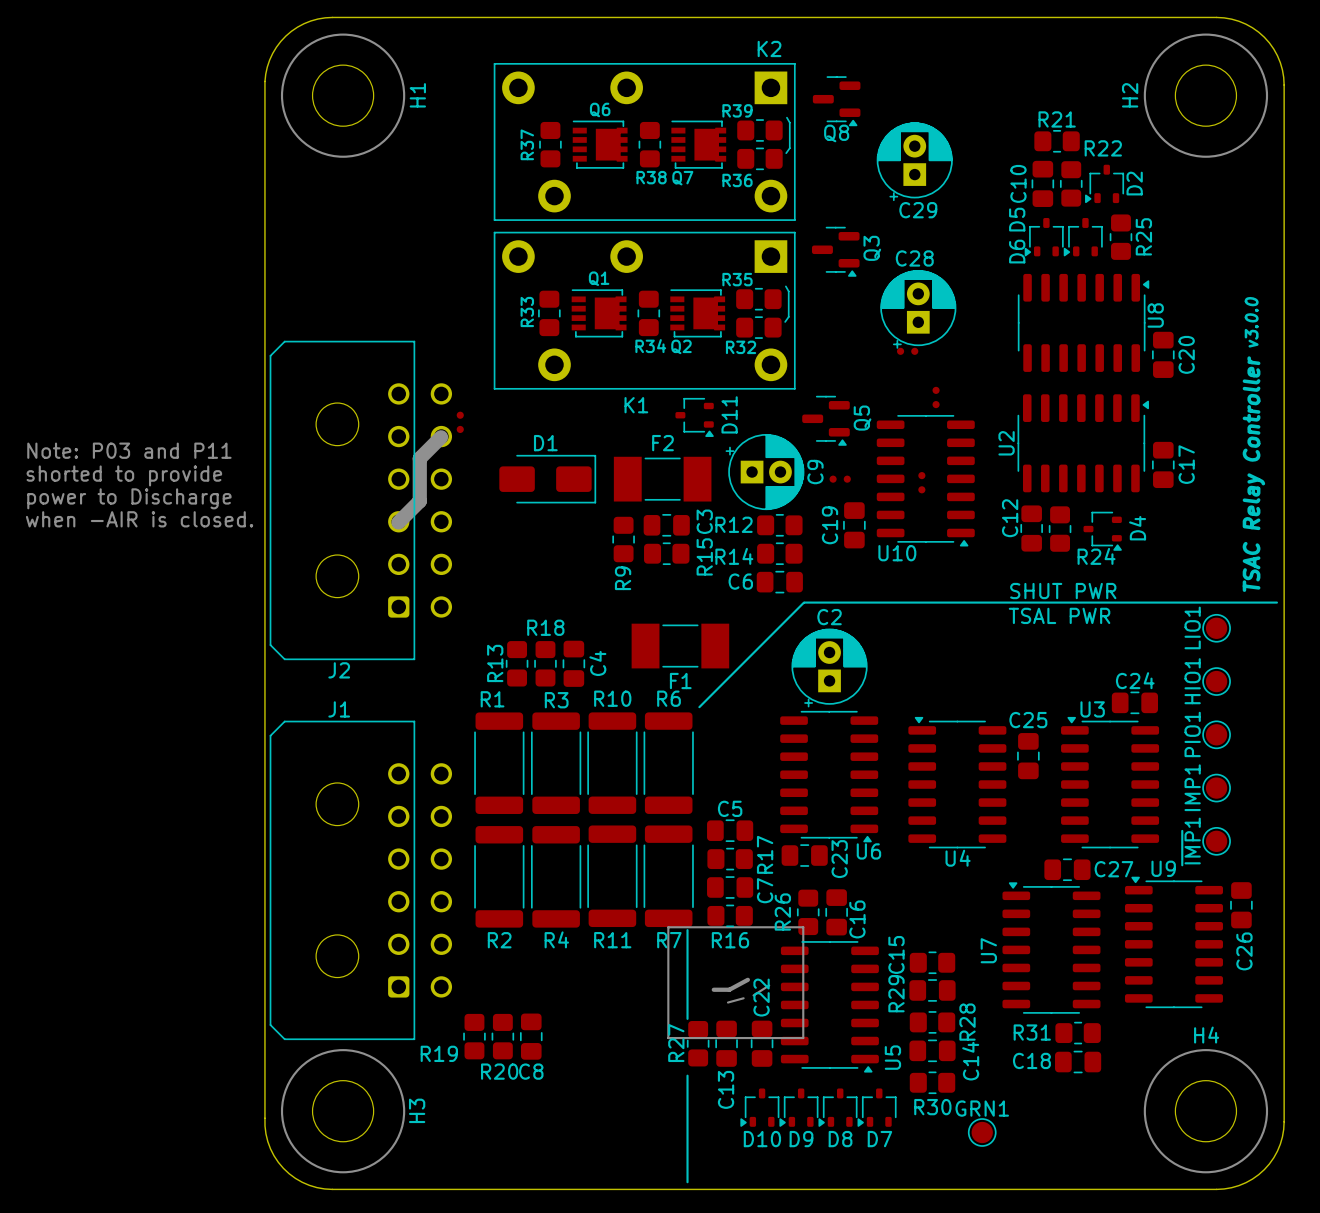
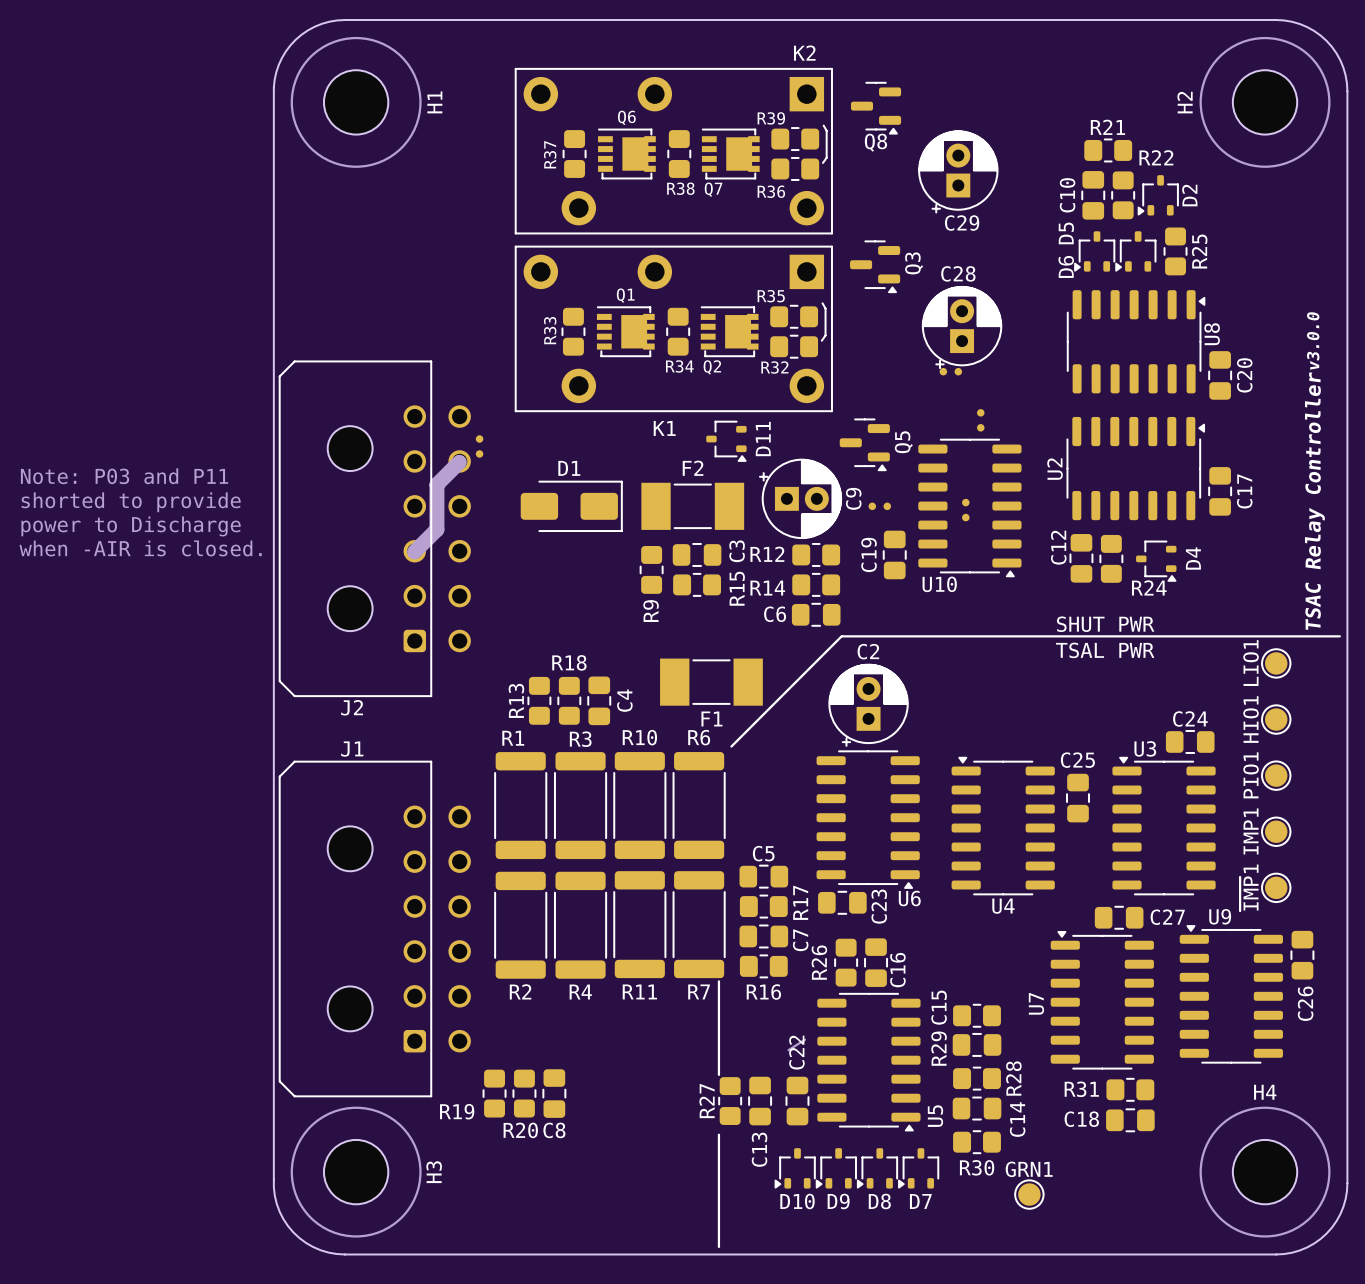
line: (668, 927) (803, 927) (803, 1038) (668, 1038) (668, 927) -> none
line: (747, 979) (729, 989) (713, 989) -> none
line: (743, 998) (727, 1002) -> none

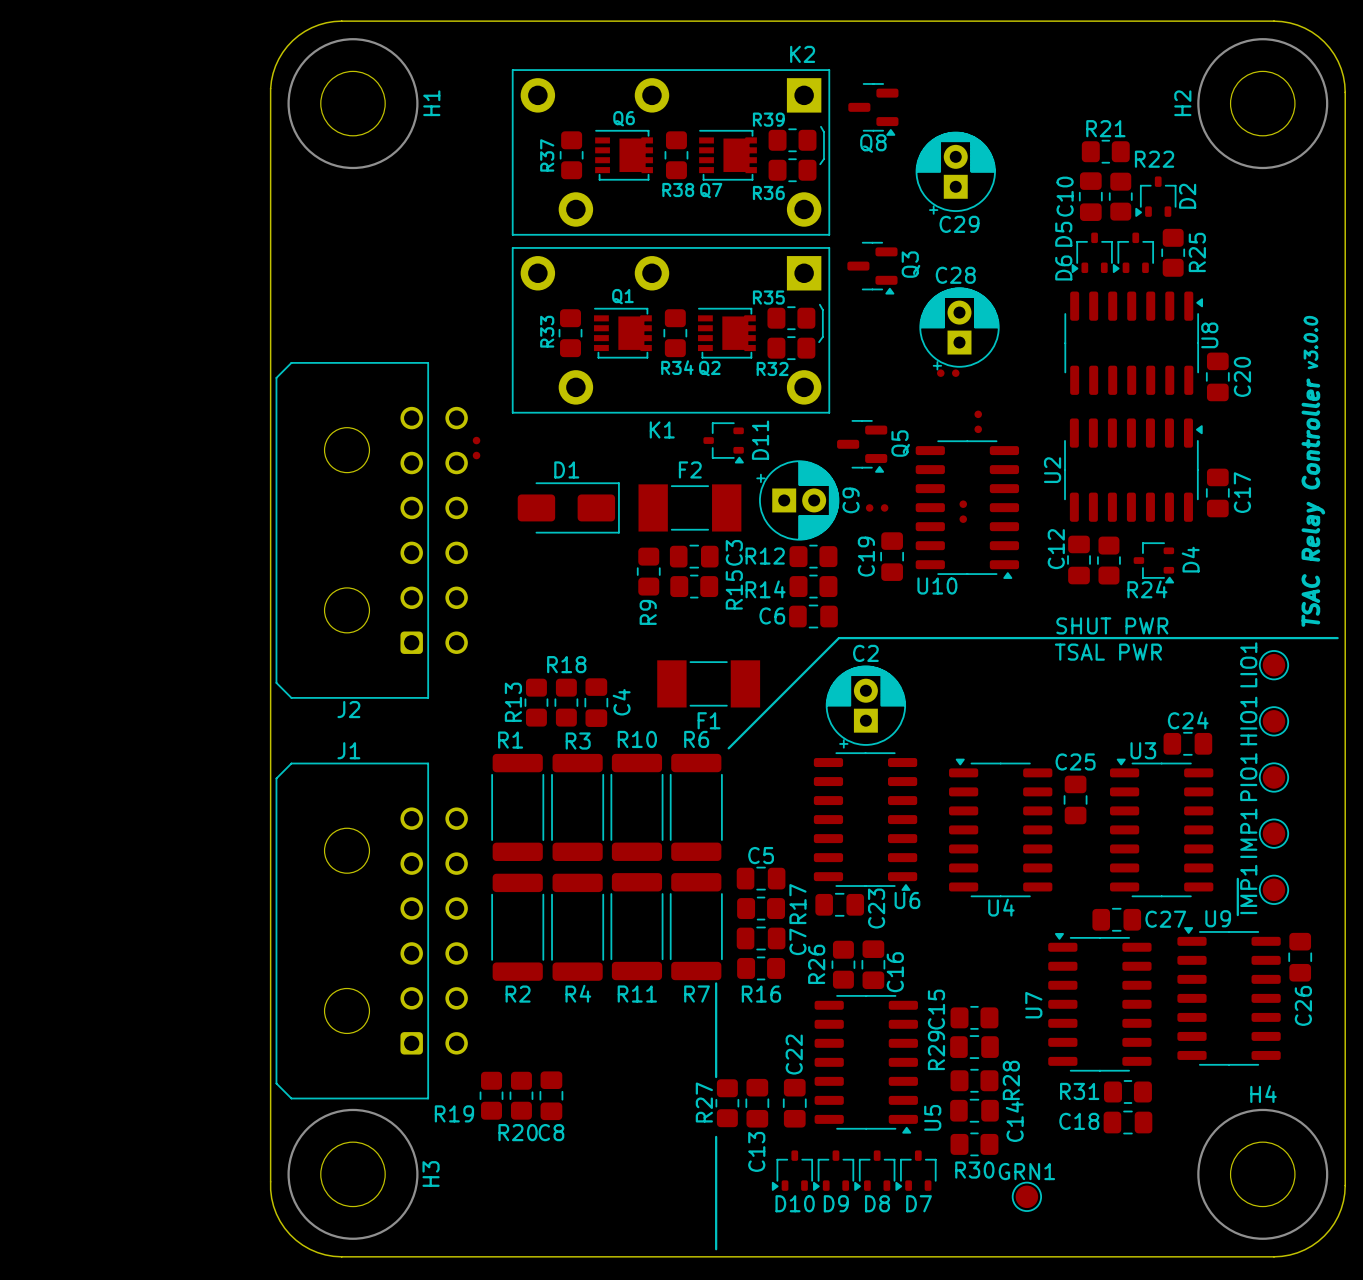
line: (459, 462) (436, 484) (436, 529) (414, 551) -> none
text: Note: P03 and P11 (124, 476) -> none
text: shorted to provide (131, 502) -> none
text: power to Discharge (131, 526) -> none
text: when -AIR is closed. (140, 548) -> none
line: (804, 1039) (788, 1050) -> none

